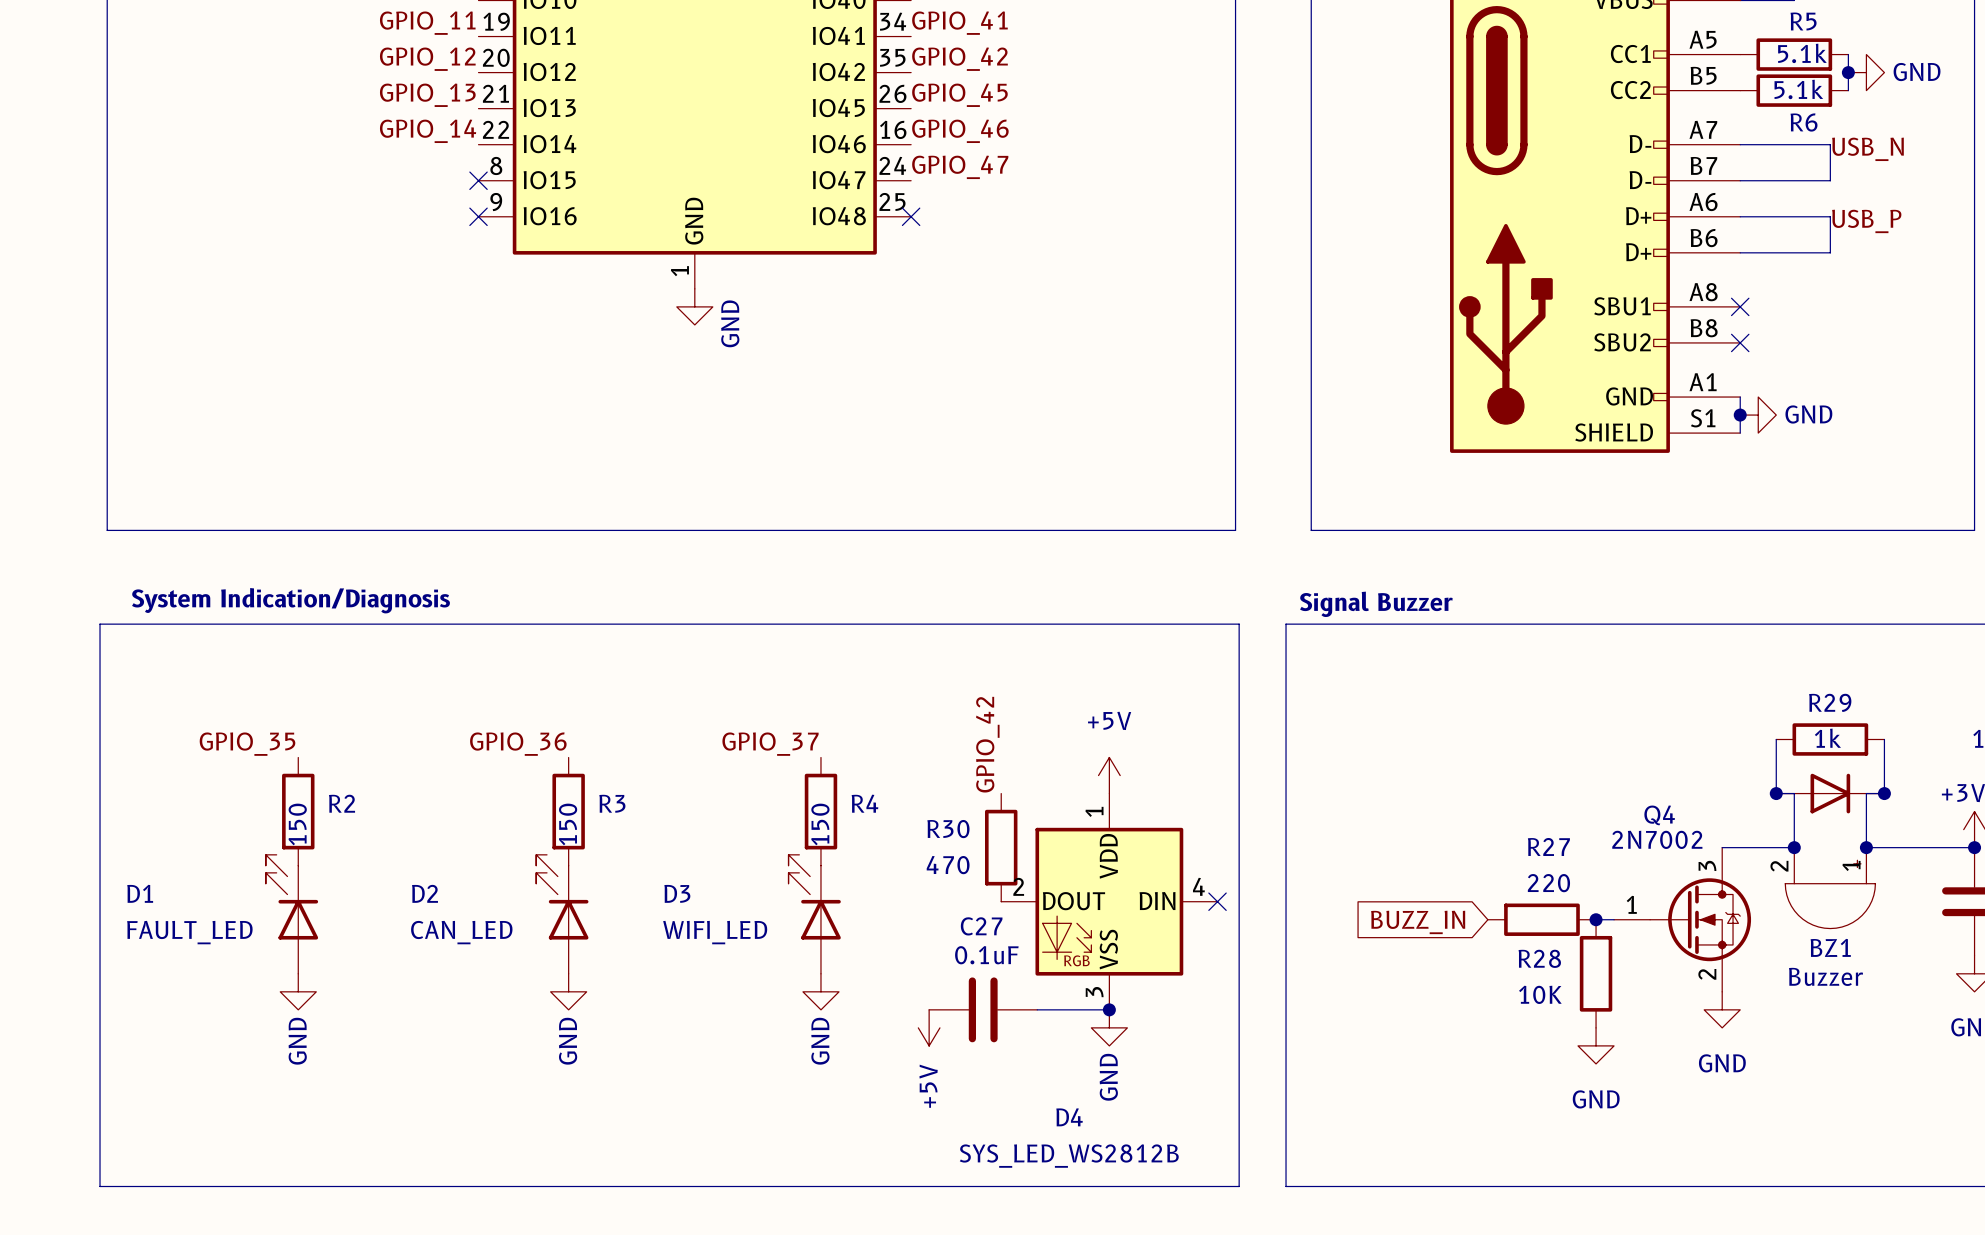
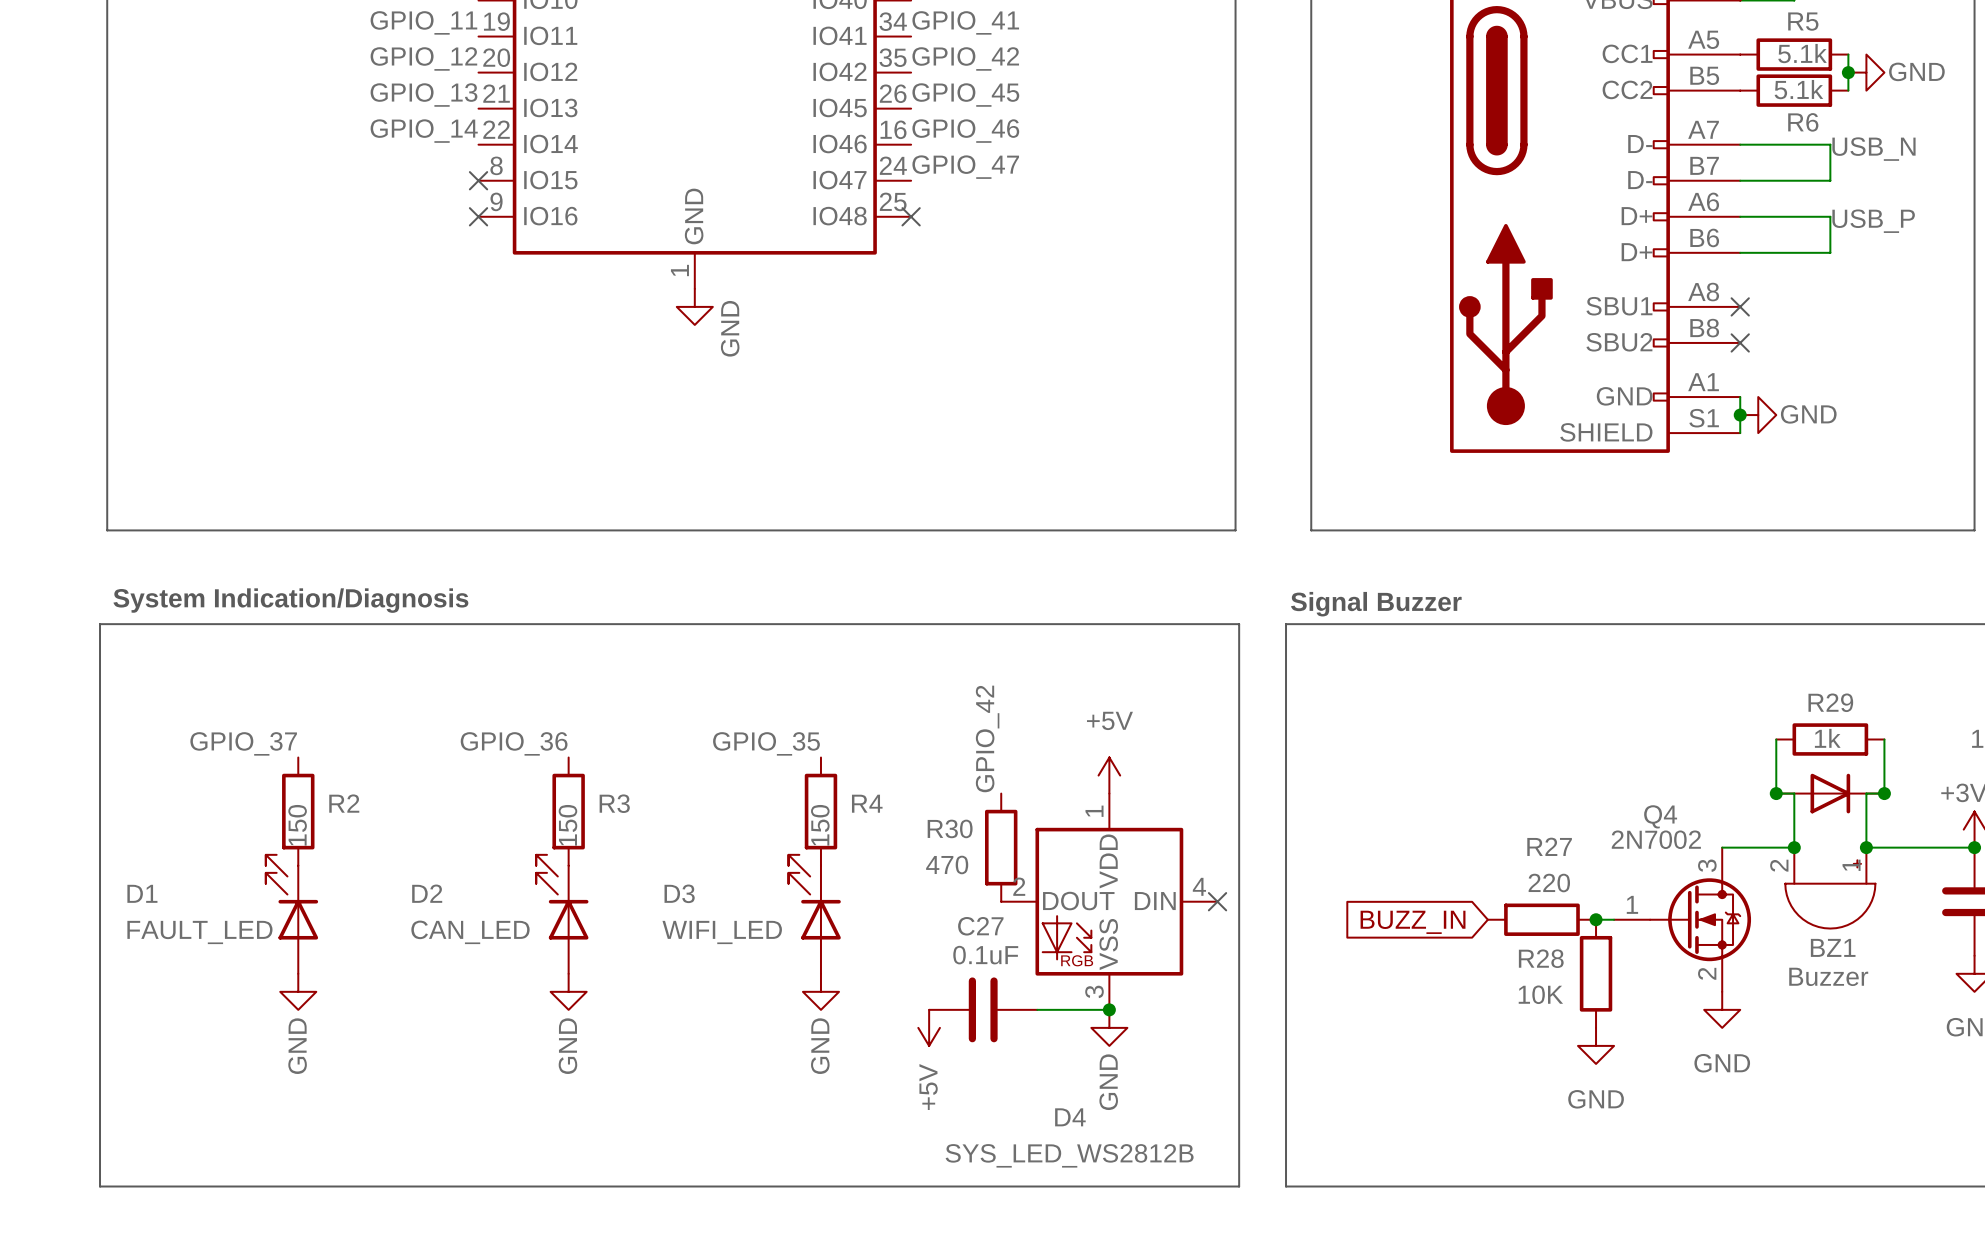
label: GPIO_35 (247, 744) -> GPIO_37 (243, 743)
label: GPIO_37 (770, 744) -> GPIO_35 (766, 743)

